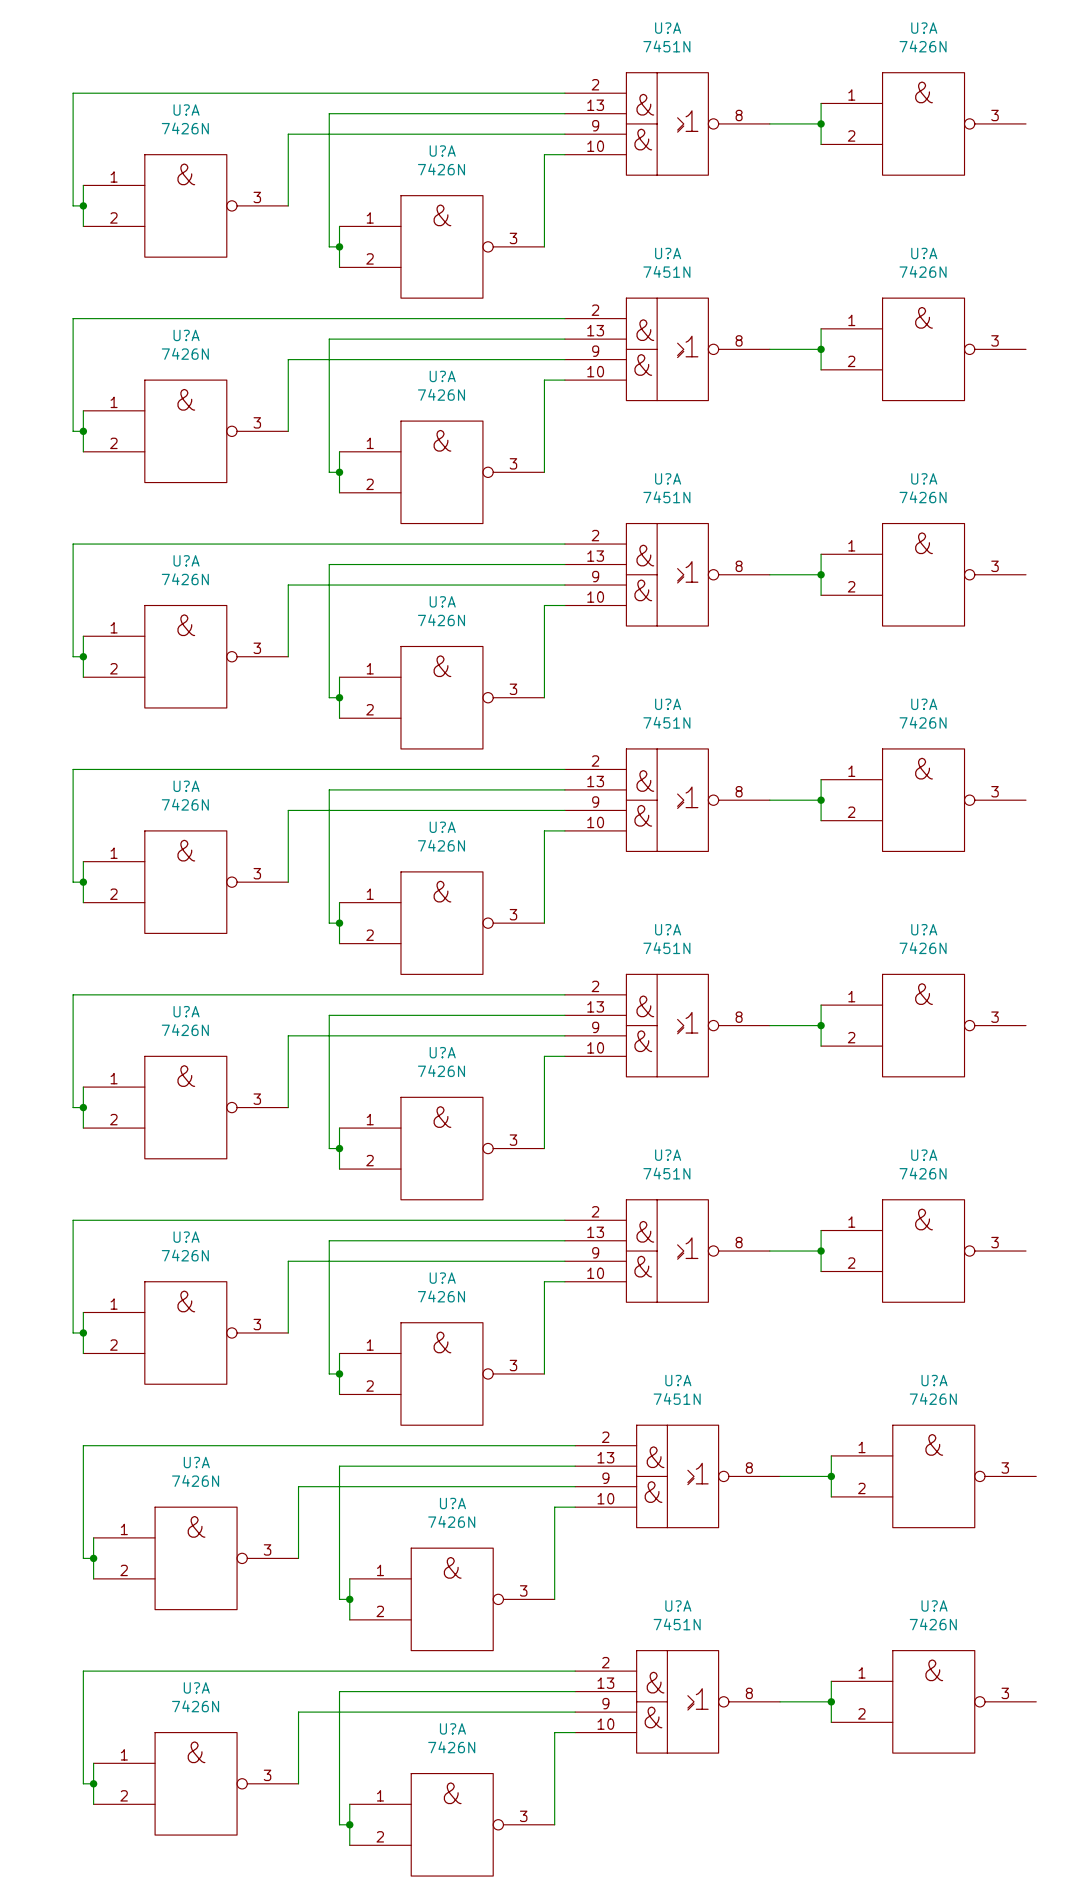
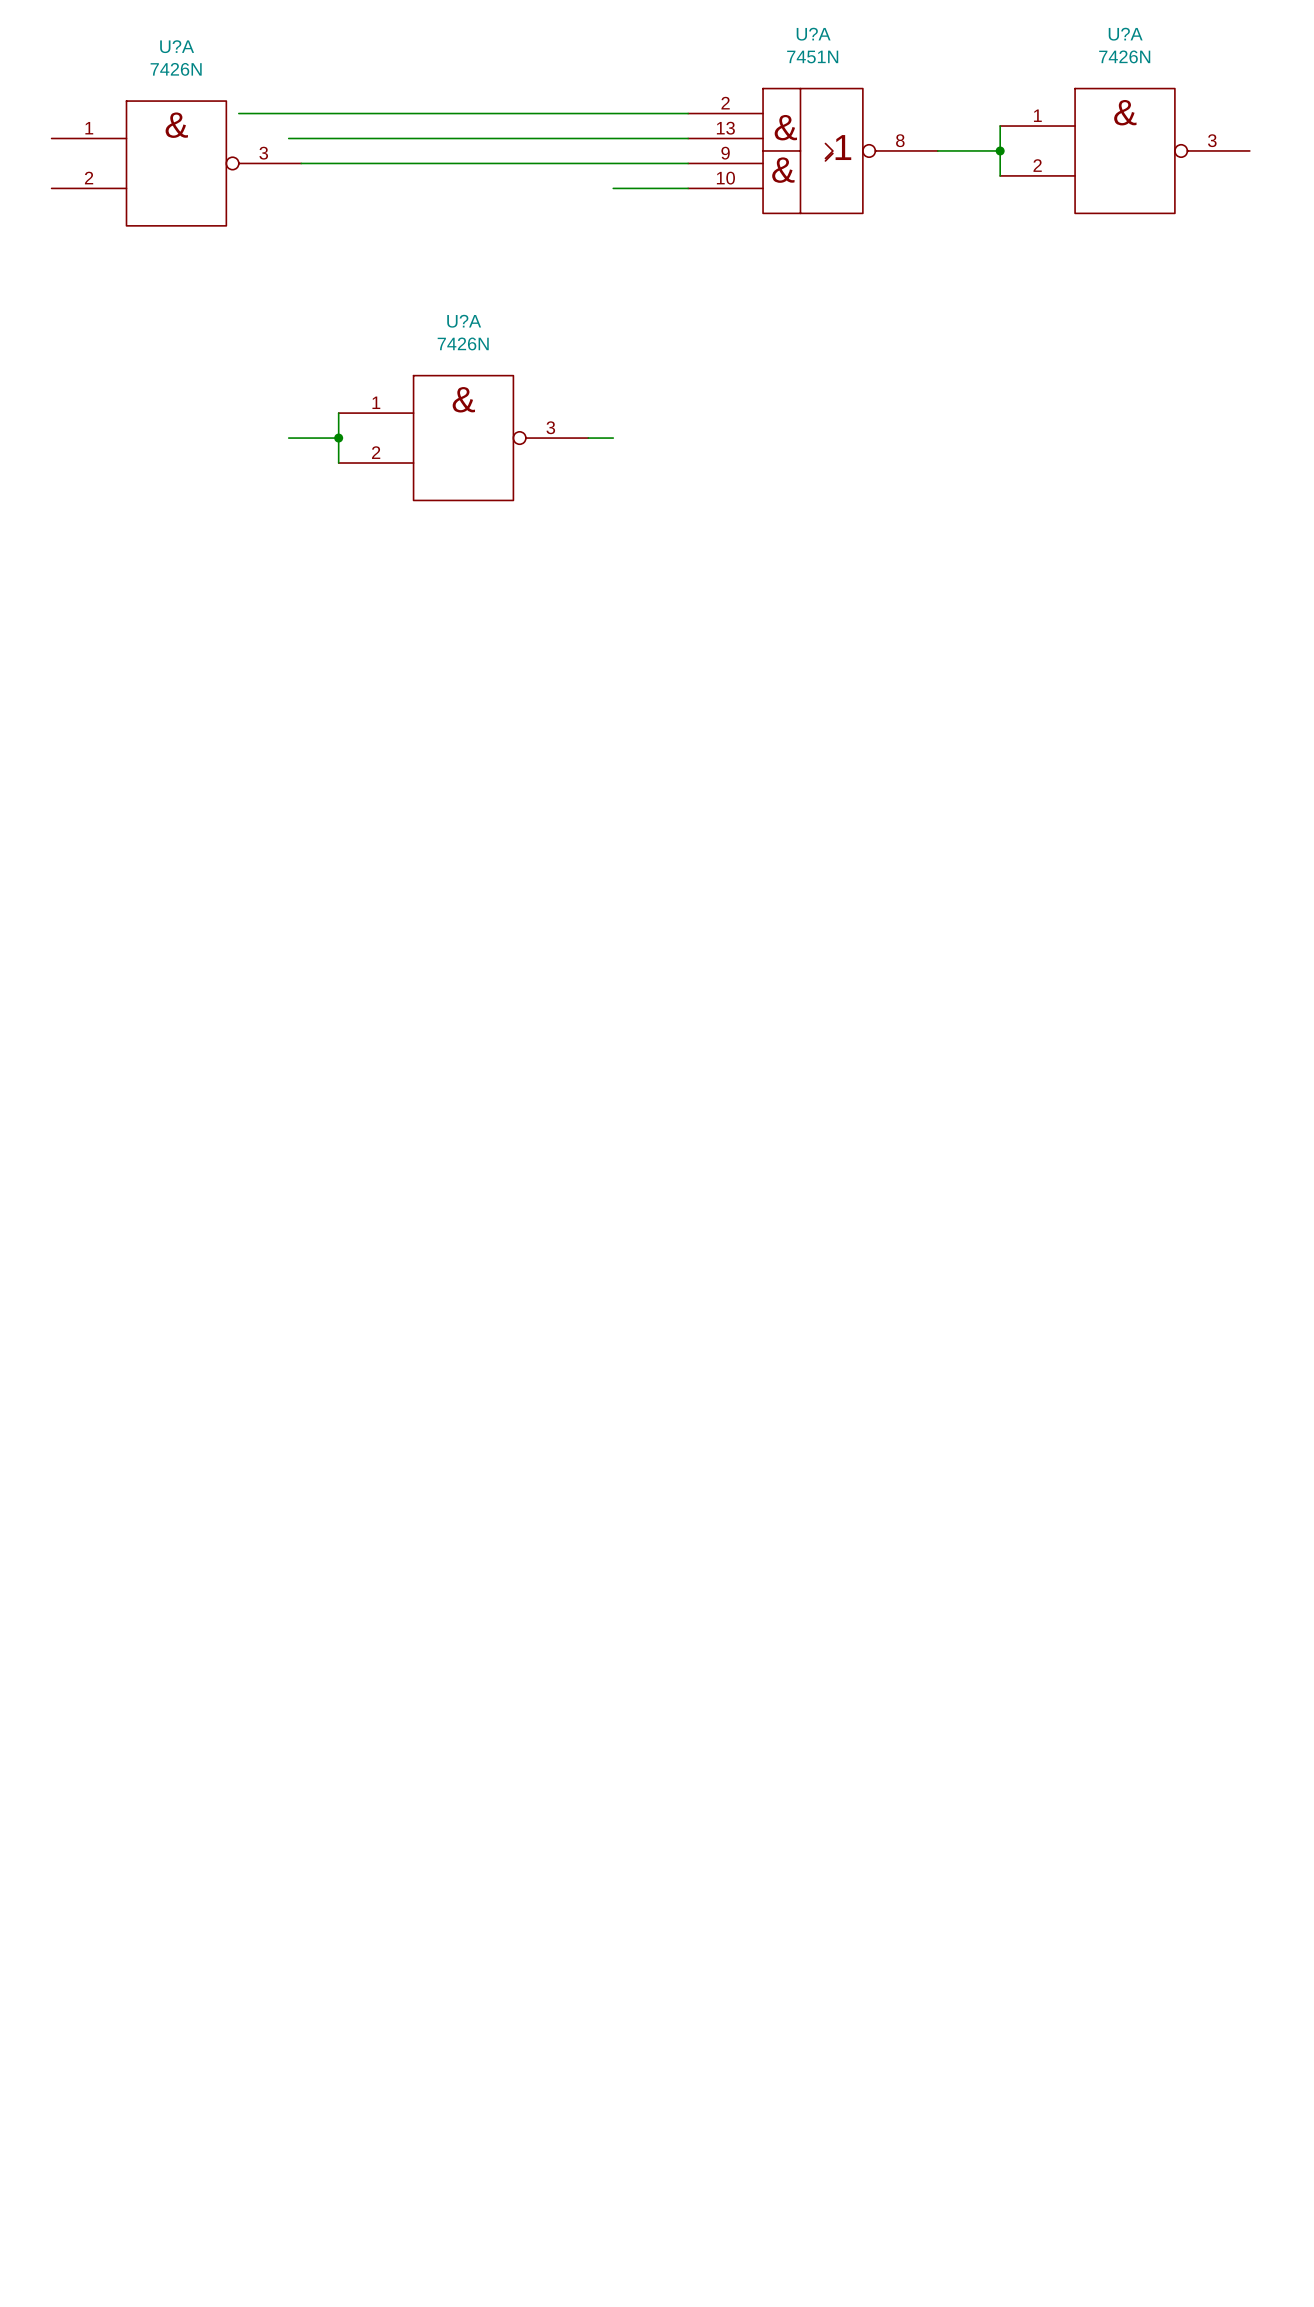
wire: (196, 93) (73, 93) (73, 205) (83, 205) -> none
wire: (329, 113) (329, 246) (339, 246) -> (401, 138) (288, 138)
wire: (288, 134) (288, 205) -> (351, 163) (301, 163)
wire: (544, 154) (544, 246) -> (663, 188) (613, 188)
wire: (83, 185) (83, 226) -> none
junction: (83, 205) -> none
U?A position: (185, 205) -> (176, 163)
wire: (339, 226) (339, 267) -> (338, 413) (338, 463)
junction: (339, 246) -> none
U?A: 7426N (441, 246) -> none
wire: (564, 318) (73, 318) (73, 431) (83, 431) -> none
wire: (821, 328) (821, 369) -> none
wire: (564, 339) (329, 339) (329, 472) (339, 472) -> none
U?A: 7451N (667, 349) -> none
wire: (769, 349) (821, 349) -> none
junction: (821, 349) -> none
U?A: 7426N (923, 349) -> none
wire: none -> (288, 438) (338, 438)
junction: none -> (338, 438)
U?A: none -> 7426N (463, 438)
wire: (482, 359) (288, 359) (288, 431) -> none
wire: (503, 359) (564, 359) -> none
wire: (564, 380) (544, 380) (544, 472) -> none
wire: (83, 410) (83, 451) -> none
junction: (83, 431) -> none
U?A: 7426N (185, 431) -> none
wire: (339, 451) (339, 492) -> none
junction: (339, 472) -> none
U?A: 7426N (441, 472) -> none
wire: (564, 544) (73, 544) (73, 656) (83, 656) -> none
wire: (821, 554) (821, 595) -> none
wire: (564, 564) (329, 564) (329, 697) (339, 697) -> none
U?A: 7451N (667, 574) -> none
wire: (769, 574) (821, 574) -> none
junction: (821, 574) -> none
U?A: 7426N (923, 574) -> none
wire: (564, 585) (288, 585) (288, 656) -> none
wire: (564, 605) (544, 605) (544, 697) -> none
wire: (83, 636) (83, 677) -> none
junction: (83, 656) -> none
U?A: 7426N (185, 656) -> none
wire: (339, 677) (339, 718) -> none
junction: (339, 697) -> none
U?A: 7426N (441, 697) -> none
wire: (564, 769) (73, 769) (73, 882) (83, 882) -> none
wire: (821, 779) (821, 820) -> none
wire: (564, 789) (329, 789) (329, 923) (339, 923) -> none
U?A: 7451N (667, 800) -> none
wire: (769, 800) (821, 800) -> none
junction: (821, 800) -> none
U?A: 7426N (923, 800) -> none
wire: (564, 810) (288, 810) (288, 882) -> none
wire: (564, 830) (544, 830) (544, 923) -> none
wire: (83, 861) (83, 902) -> none
junction: (83, 882) -> none
U?A: 7426N (185, 882) -> none
wire: (339, 902) (339, 943) -> none
junction: (339, 923) -> none
U?A: 7426N (441, 923) -> none
wire: (564, 994) (73, 994) (73, 1107) (83, 1107) -> none
wire: (821, 1005) (821, 1046) -> none
wire: (564, 1015) (329, 1015) (329, 1148) (339, 1148) -> none
U?A: 7451N (667, 1025) -> none
wire: (769, 1025) (821, 1025) -> none
junction: (821, 1025) -> none
U?A: 7426N (923, 1025) -> none
wire: (564, 1035) (288, 1035) (288, 1107) -> none
wire: (564, 1056) (544, 1056) (544, 1148) -> none
wire: (83, 1087) (83, 1128) -> none
junction: (83, 1107) -> none
U?A: 7426N (185, 1107) -> none
wire: (339, 1128) (339, 1169) -> none
junction: (339, 1148) -> none
U?A: 7426N (441, 1148) -> none
wire: (564, 1220) (73, 1220) (73, 1332) (83, 1332) -> none
wire: (821, 1230) (821, 1271) -> none
wire: (564, 1240) (329, 1240) (329, 1373) (339, 1373) -> none
U?A: 7451N (667, 1251) -> none
wire: (769, 1251) (821, 1251) -> none
junction: (821, 1251) -> none
U?A: 7426N (923, 1251) -> none
wire: (564, 1261) (288, 1261) (288, 1332) -> none
wire: (564, 1281) (544, 1281) (544, 1373) -> none
wire: (83, 1312) (83, 1353) -> none
junction: (83, 1332) -> none
U?A: 7426N (185, 1332) -> none
wire: (339, 1353) (339, 1394) -> none
junction: (339, 1373) -> none
U?A: 7426N (441, 1373) -> none
wire: (575, 1445) (83, 1445) (83, 1558) (93, 1558) -> none
wire: (831, 1455) (831, 1496) -> none
wire: (575, 1466) (339, 1466) (339, 1599) (349, 1599) -> none
U?A: 7451N (677, 1476) -> none
wire: (780, 1476) (831, 1476) -> none
junction: (831, 1476) -> none
U?A: 7426N (933, 1476) -> none
wire: (575, 1486) (298, 1486) (298, 1558) -> none
wire: (575, 1507) (554, 1507) (554, 1599) -> none
wire: (93, 1537) (93, 1578) -> none
junction: (93, 1558) -> none
U?A: 7426N (196, 1558) -> none
wire: (349, 1578) (349, 1619) -> none
junction: (349, 1599) -> none
U?A: 7426N (452, 1599) -> none
wire: (575, 1671) (83, 1671) (83, 1783) (93, 1783) -> none
wire: (831, 1681) (831, 1722) -> none
wire: (575, 1691) (339, 1691) (339, 1824) (349, 1824) -> none
U?A: 7451N (677, 1701) -> none
wire: (780, 1701) (831, 1701) -> none
junction: (831, 1701) -> none
U?A: 7426N (933, 1701) -> none
wire: (575, 1712) (298, 1712) (298, 1783) -> none
wire: (575, 1732) (554, 1732) (554, 1824) -> none
wire: (93, 1763) (93, 1804) -> none
junction: (93, 1783) -> none
U?A: 7426N (196, 1783) -> none
wire: (349, 1804) (349, 1845) -> none
junction: (349, 1824) -> none
U?A: 7426N (452, 1824) -> none

